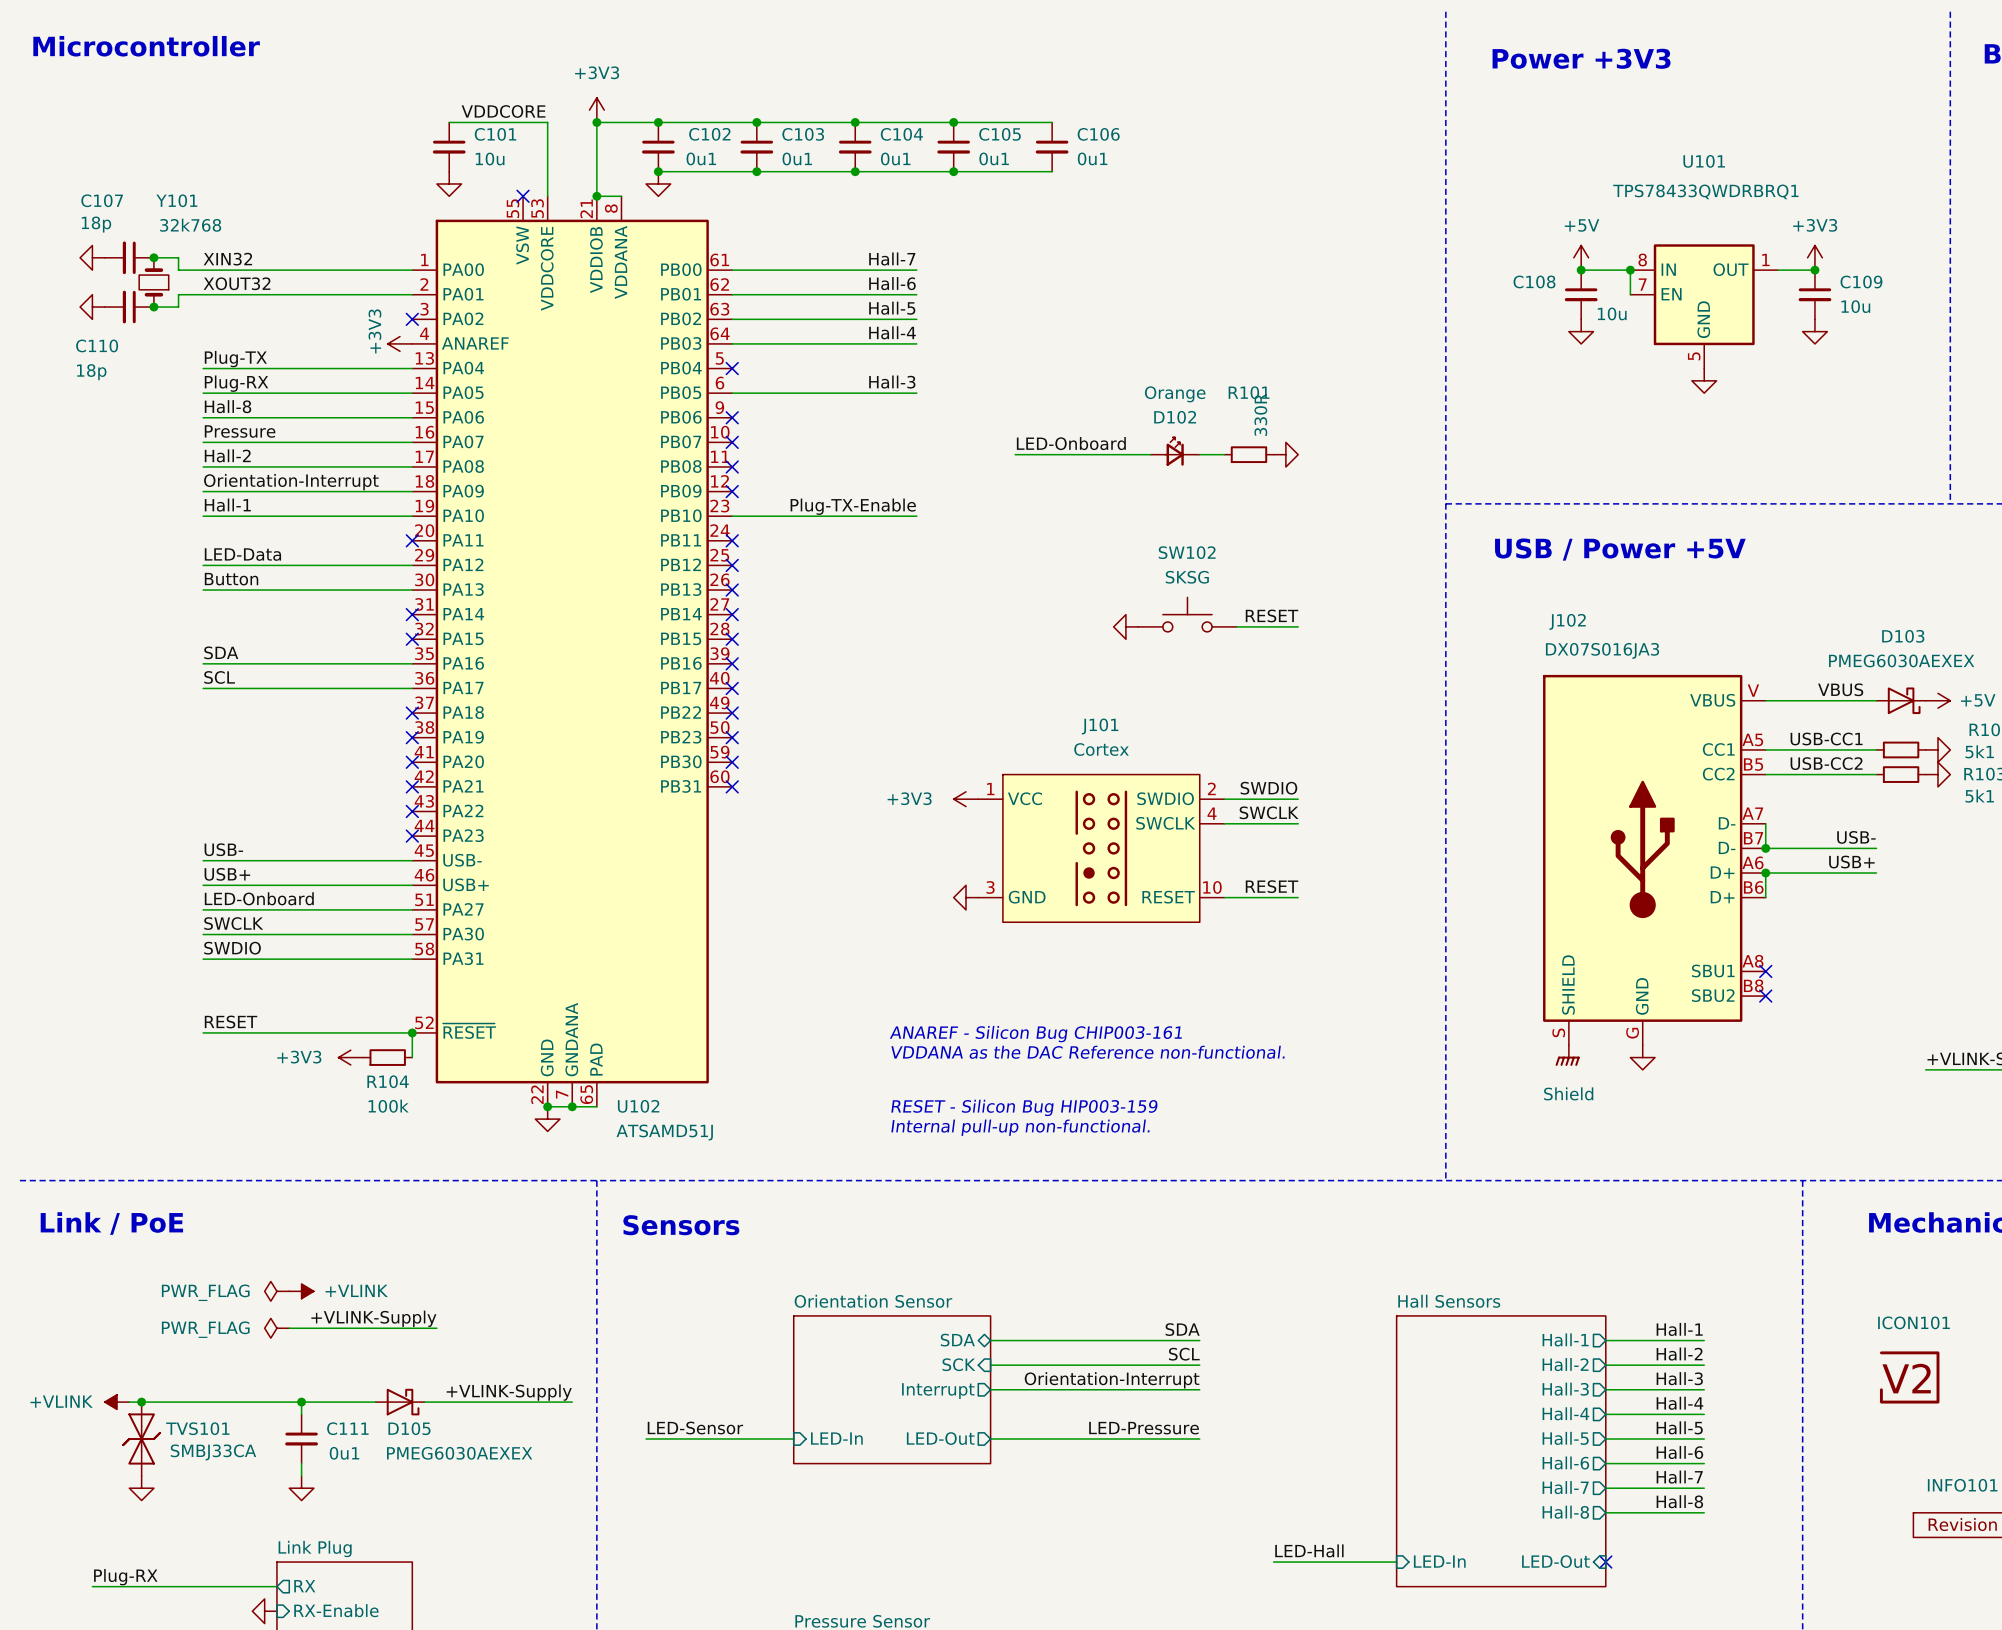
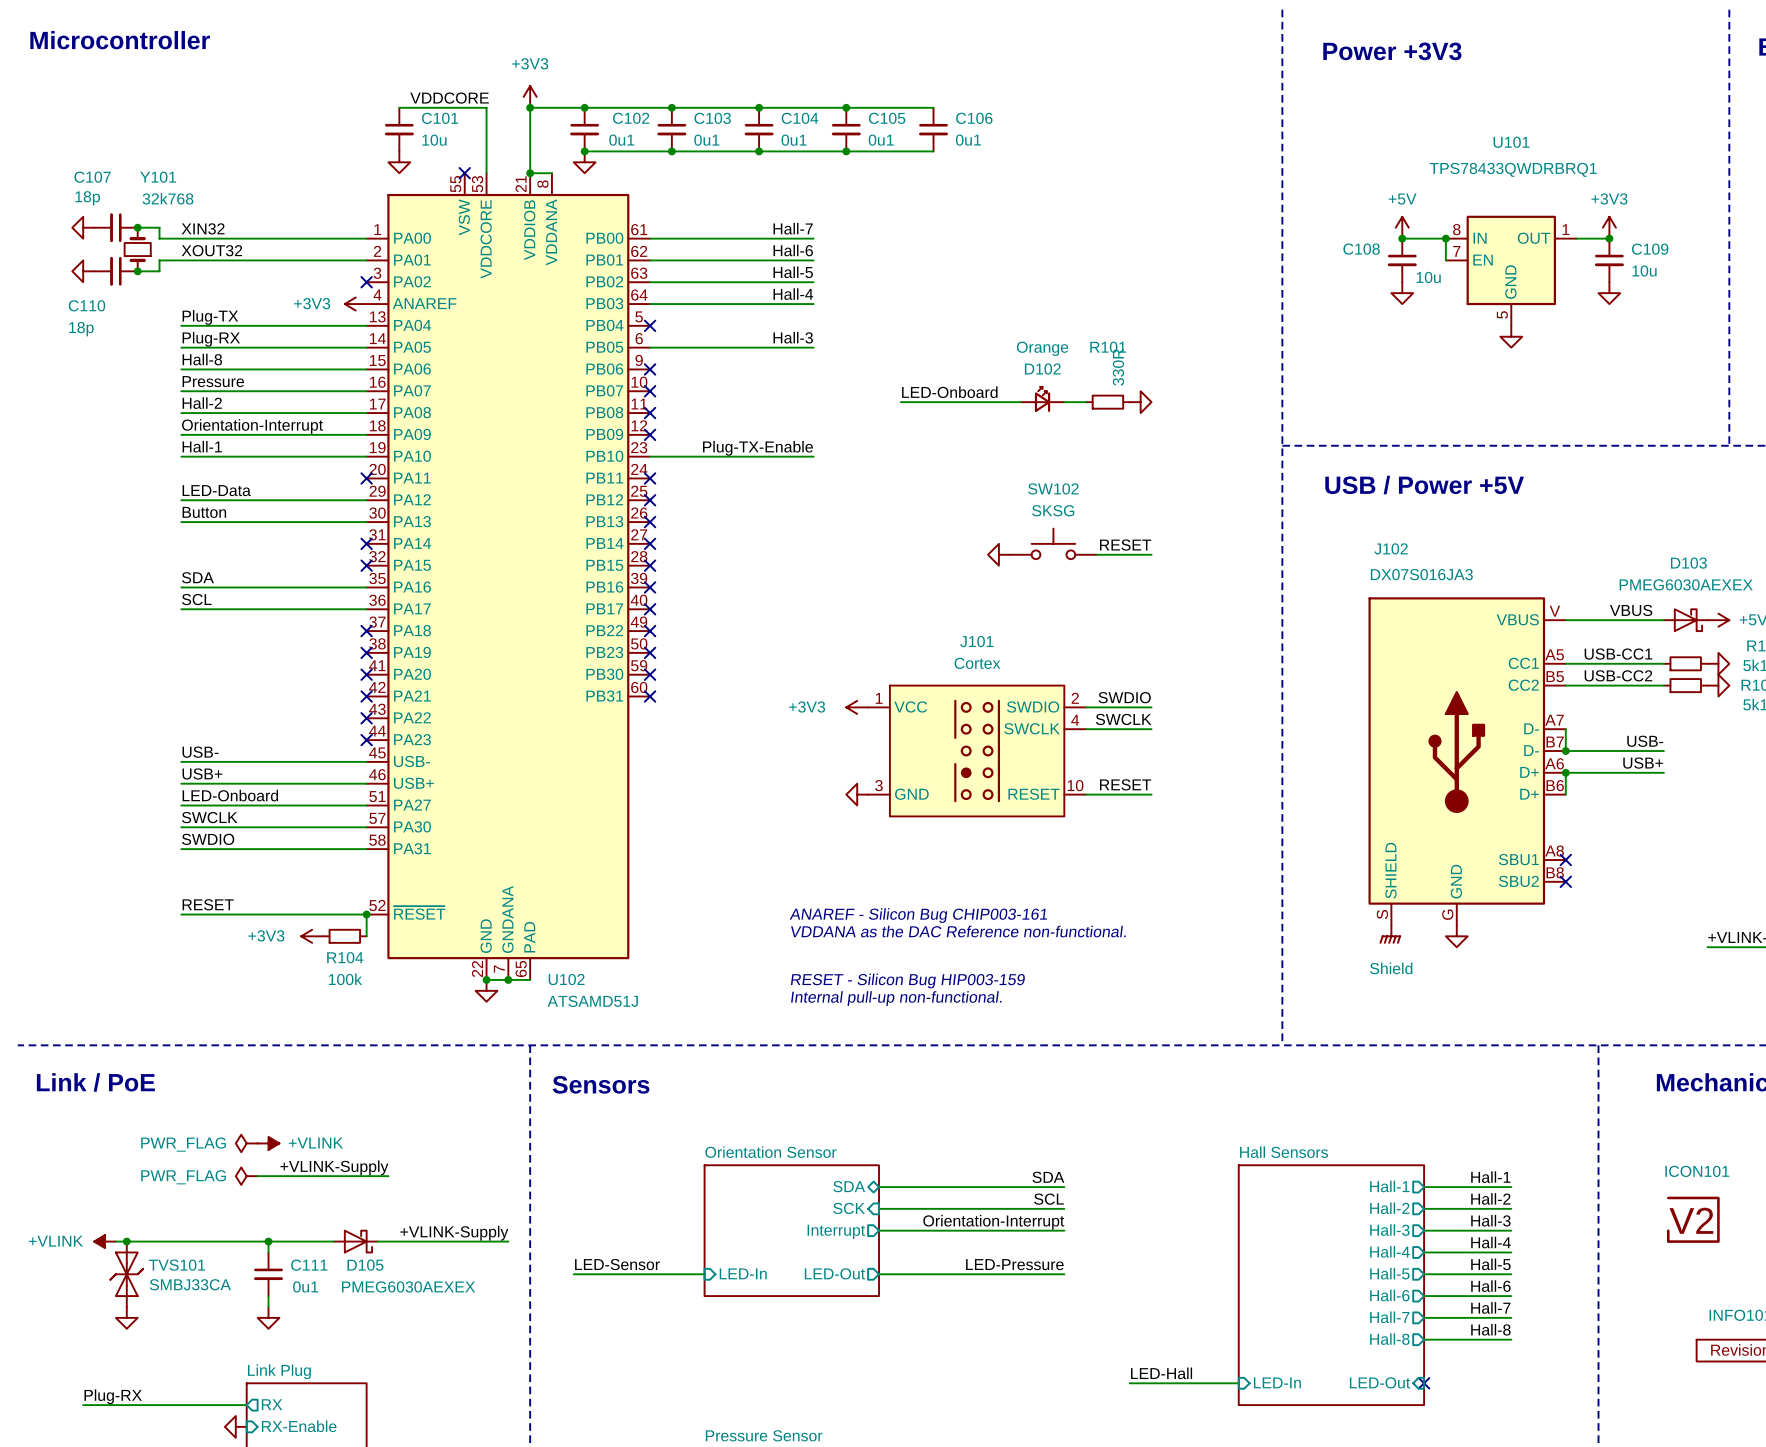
power symbol text rotation: 0° (374, 331) -> 90° clockwise (312, 303)

